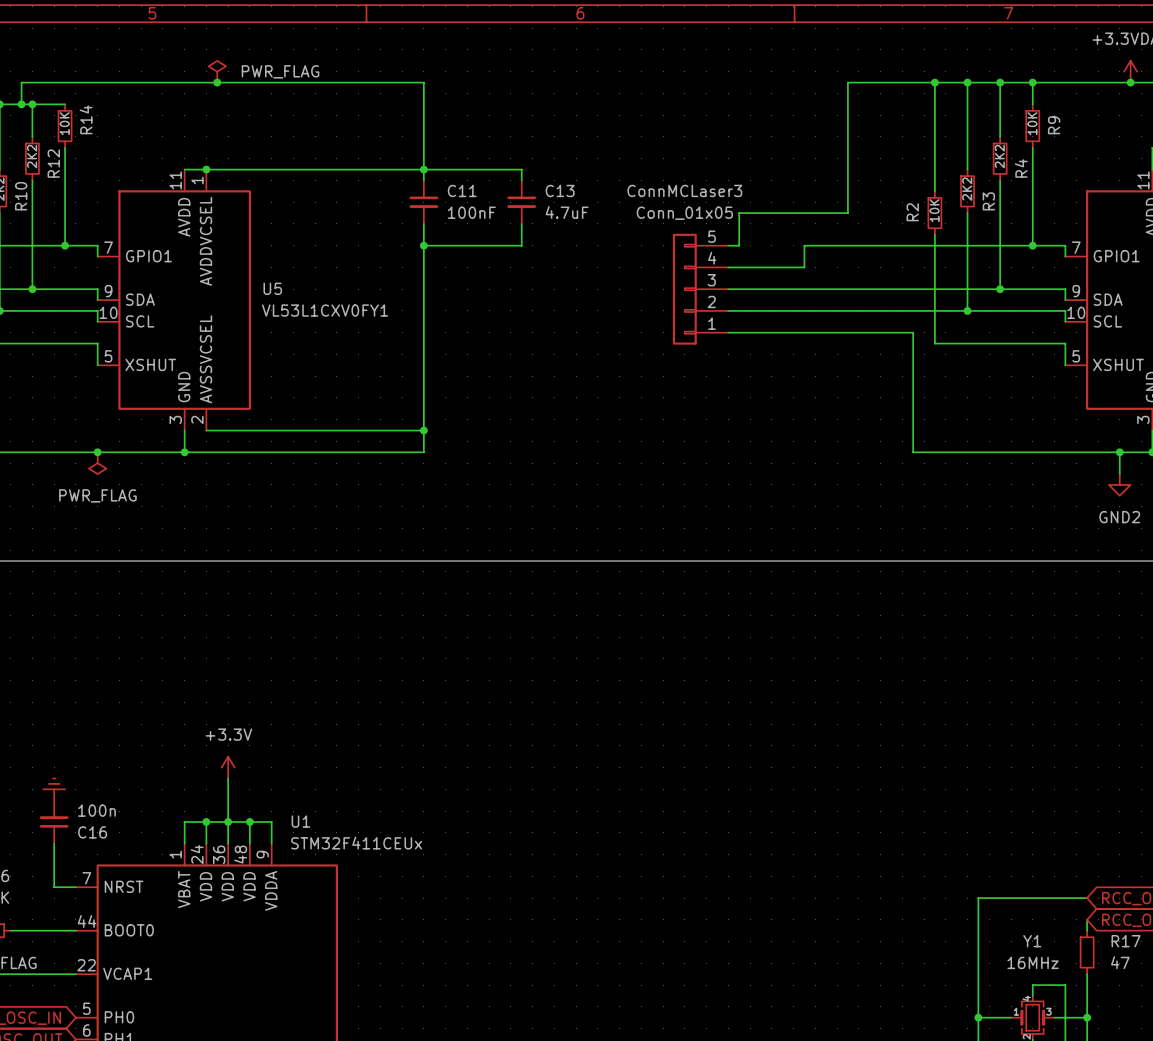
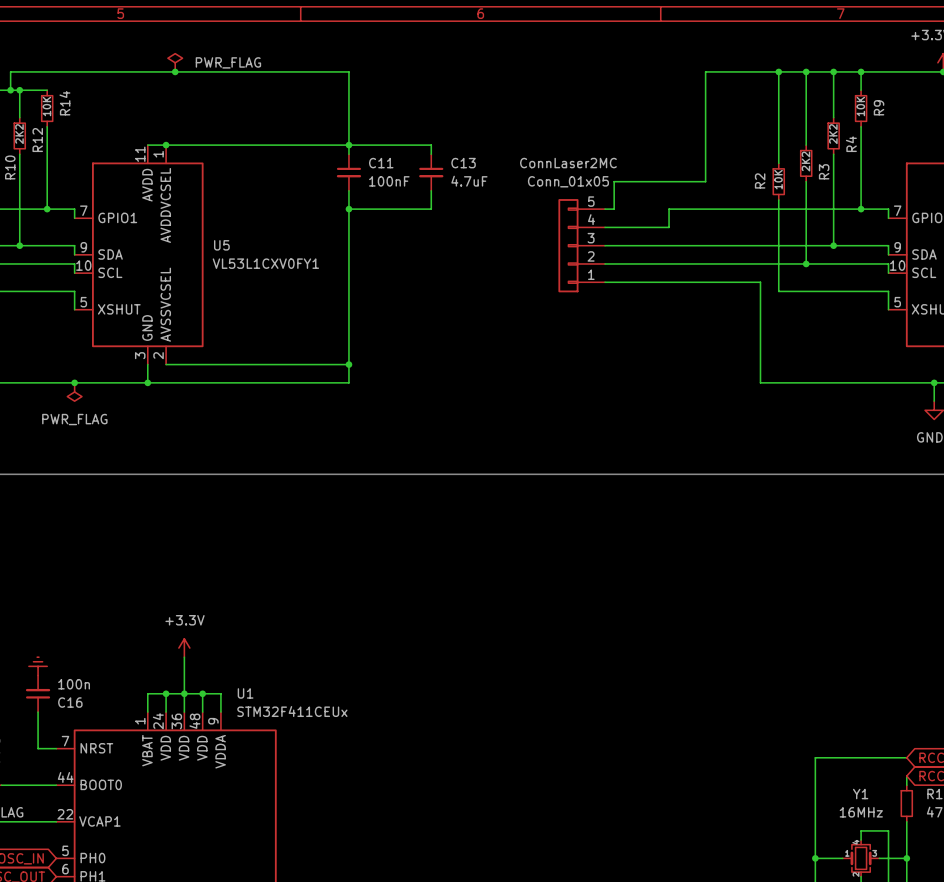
ConnMCLaser3 name: ConnMCLaser3 (684, 190) -> ConnLaser2MC (568, 163)

